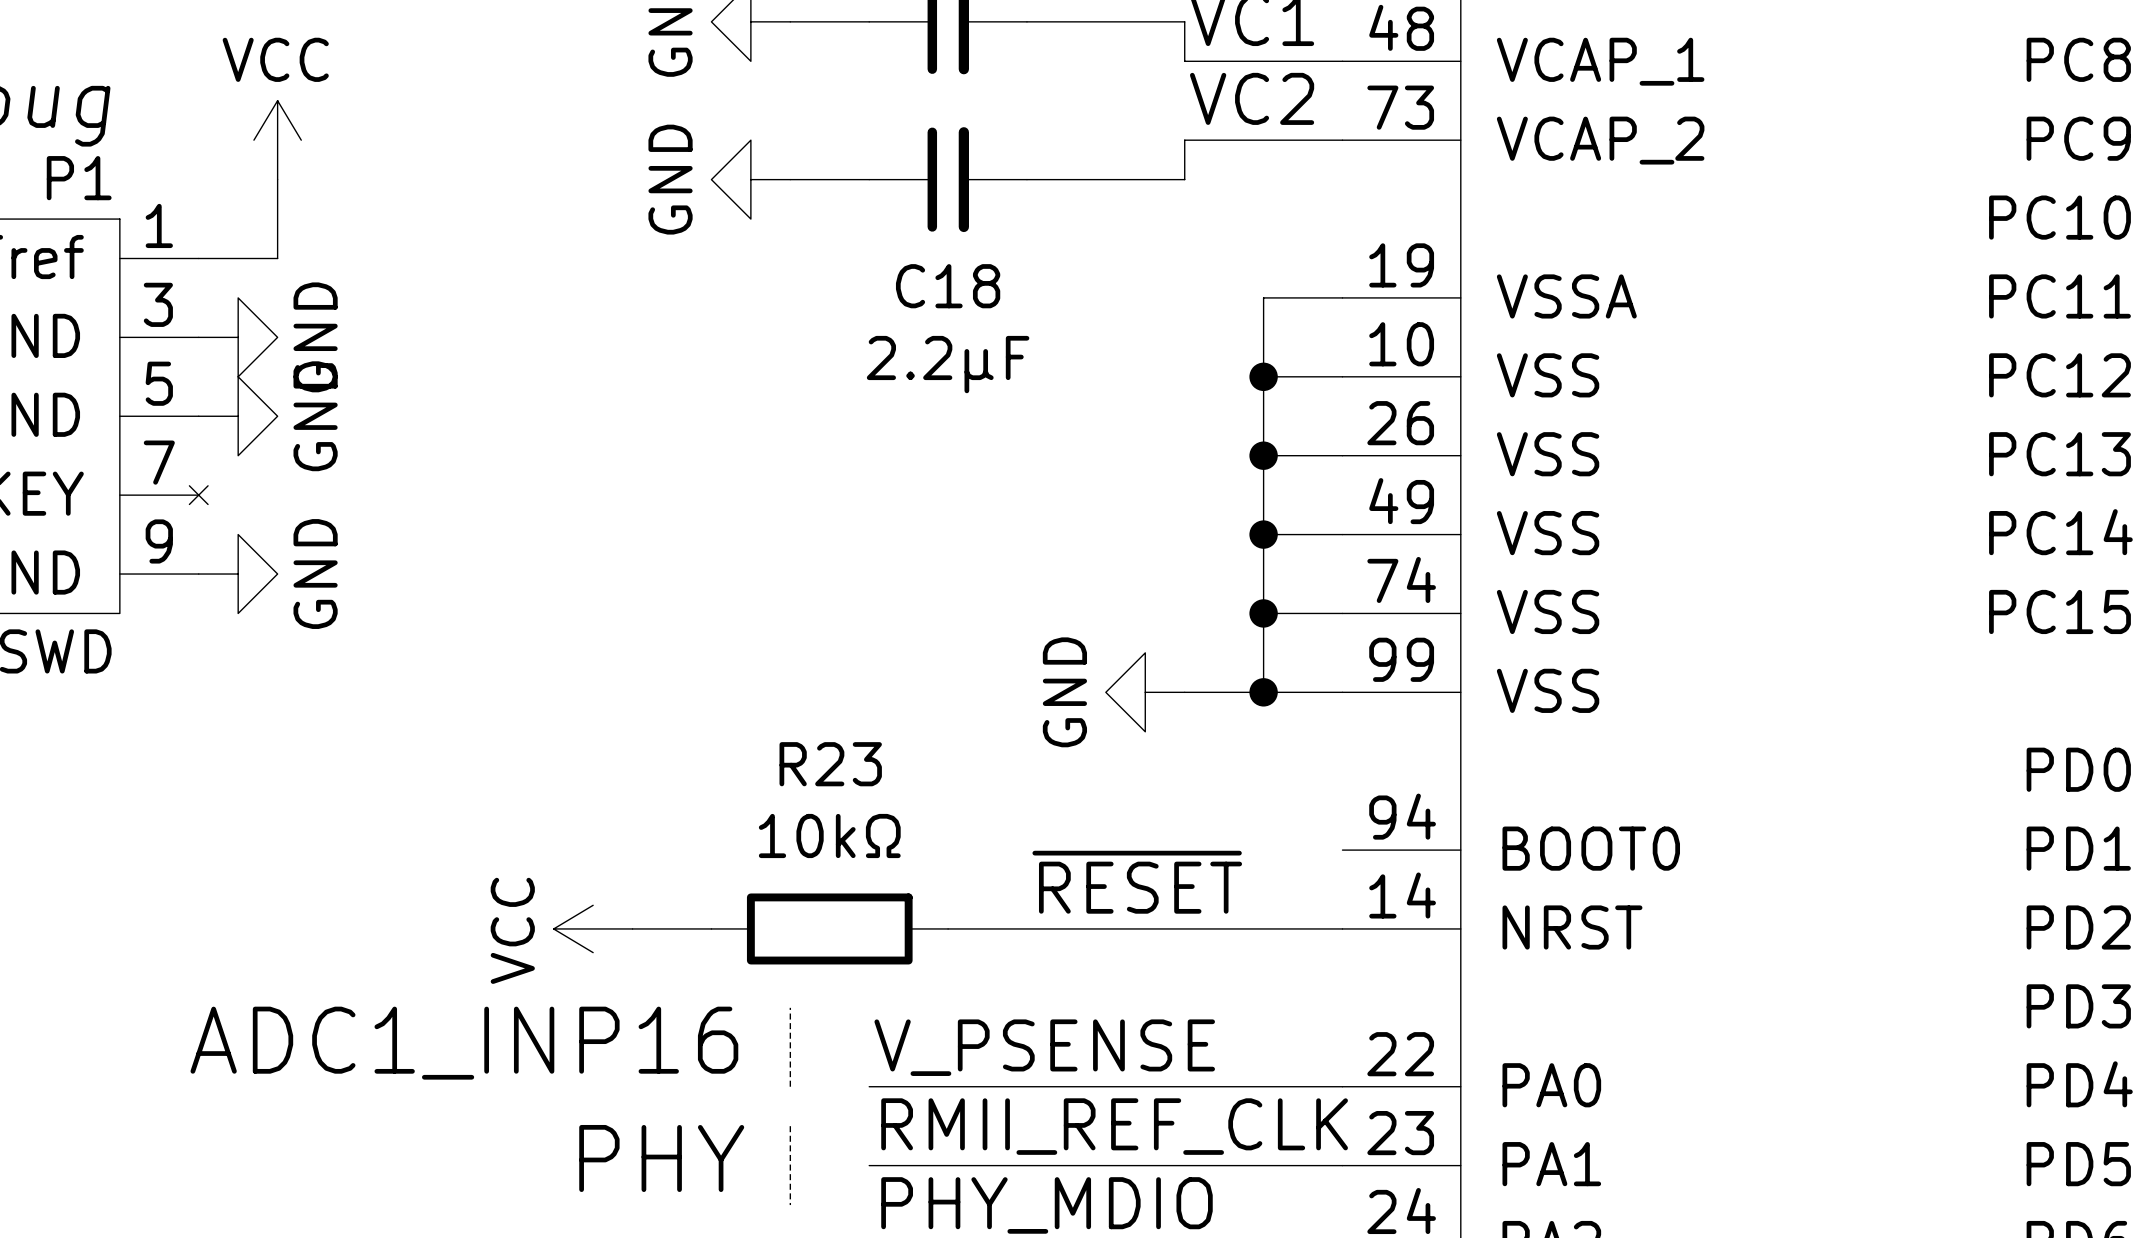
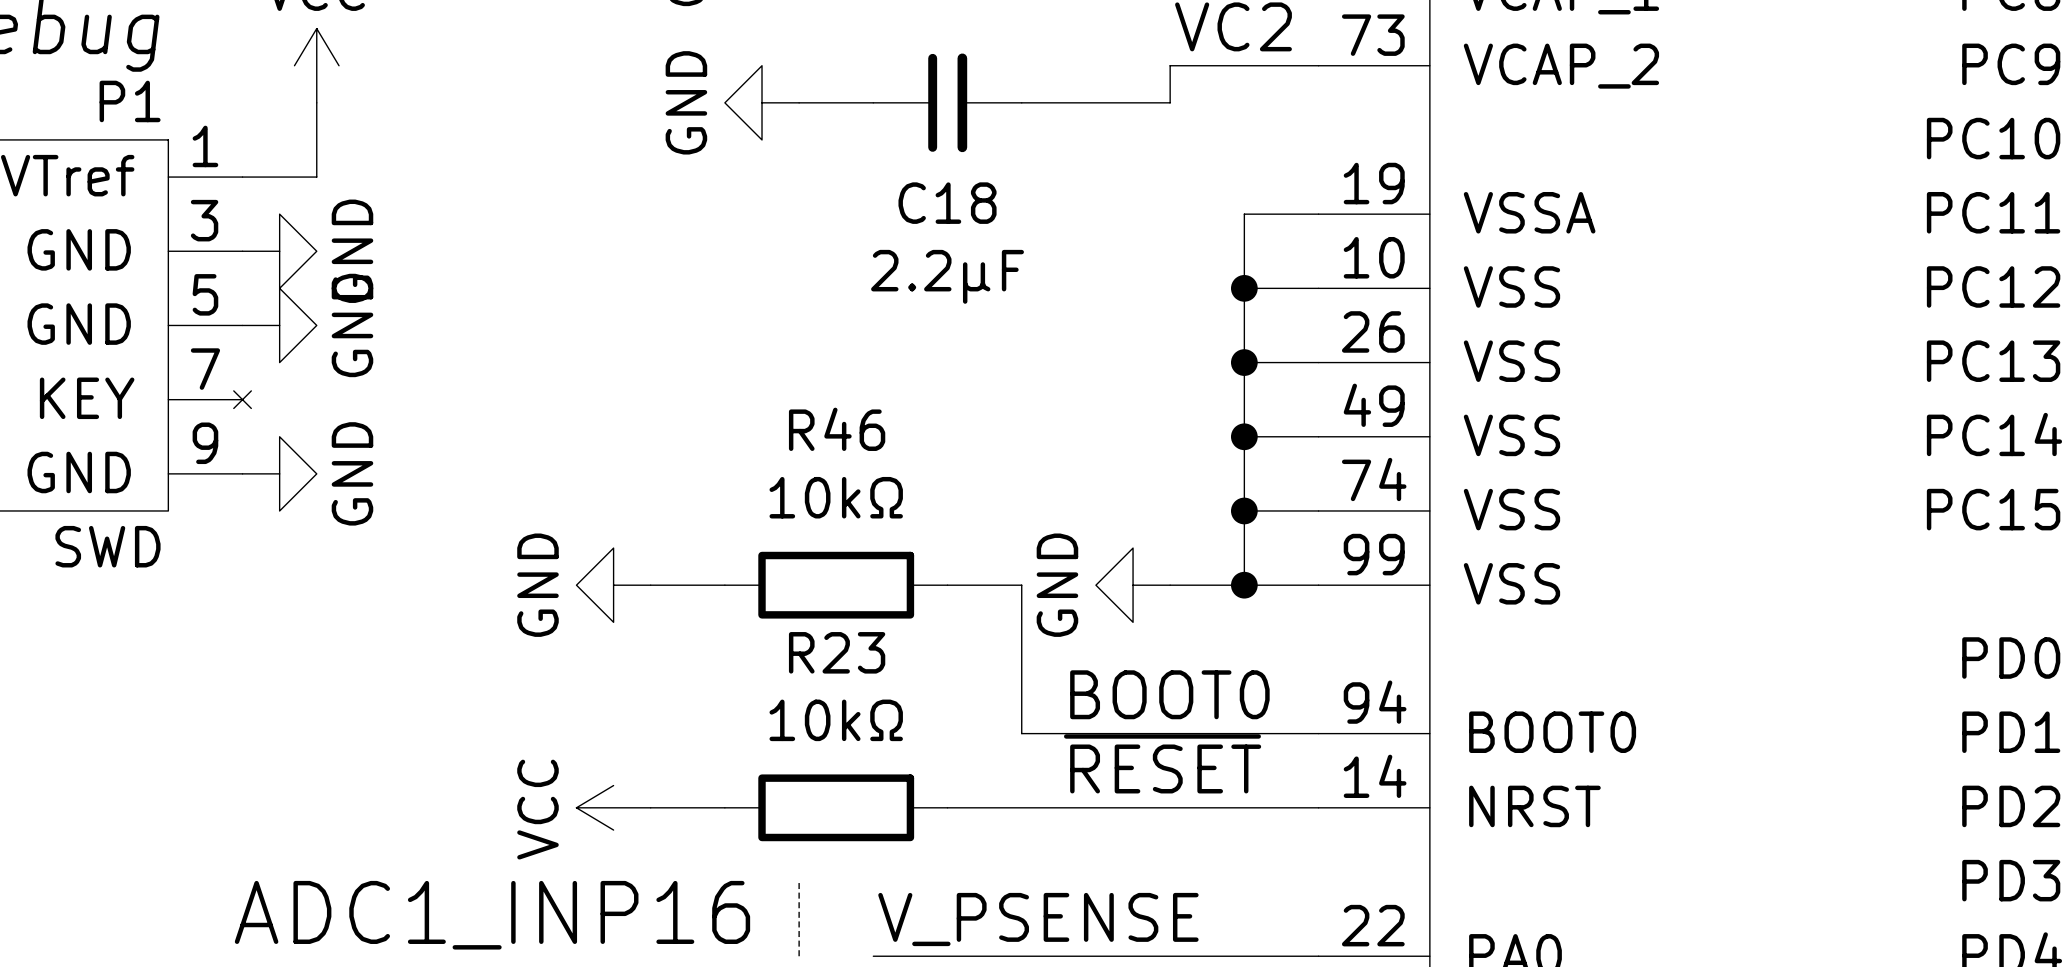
power symbol: none -> GND (613, 585)
wire: none -> (650, 585) (724, 585)
R46: none -> 10kΩ (836, 585)
wire: none -> (947, 585) (1021, 585) (1021, 733) (1318, 733)
label: none -> BOOT0 (1169, 694)
label position: ~{RESET} (1137, 882) -> ~{RESET} (1162, 763)

